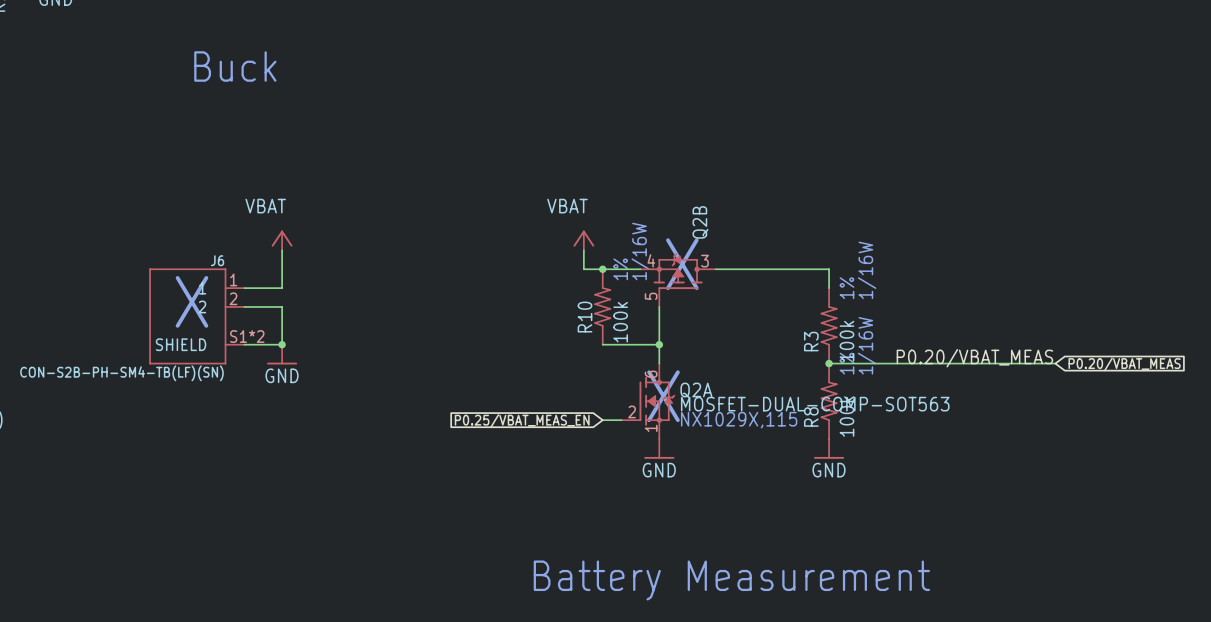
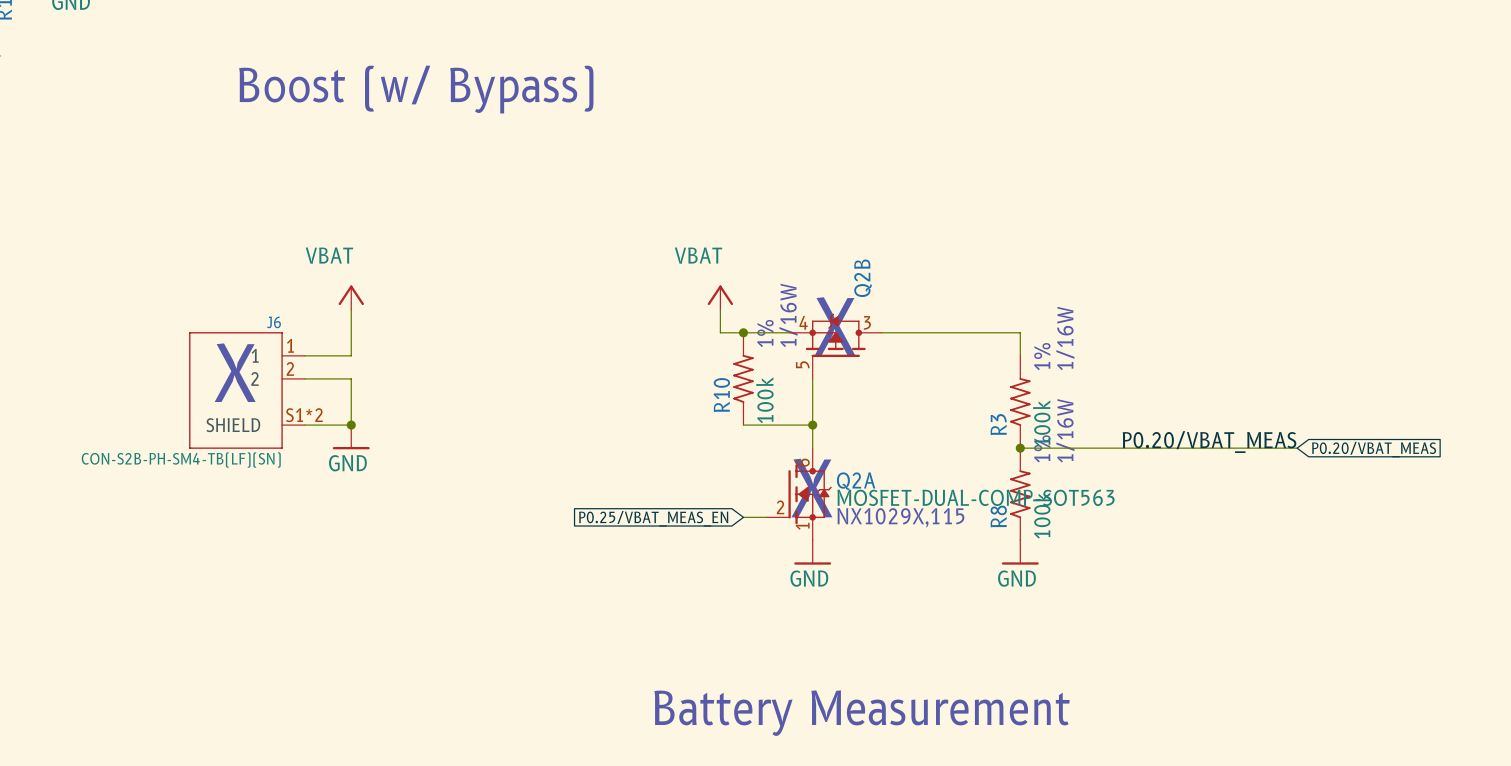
text: Buck (235, 66) -> Boost (w/ Bypass) (416, 89)

